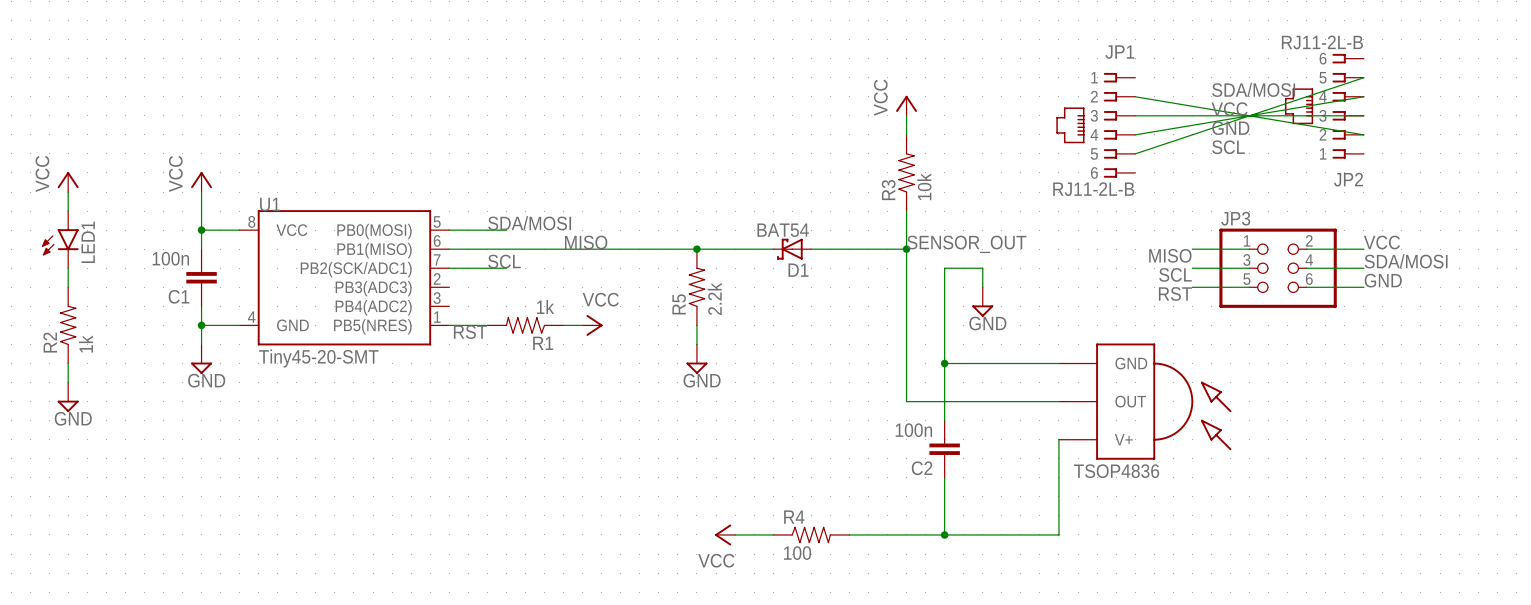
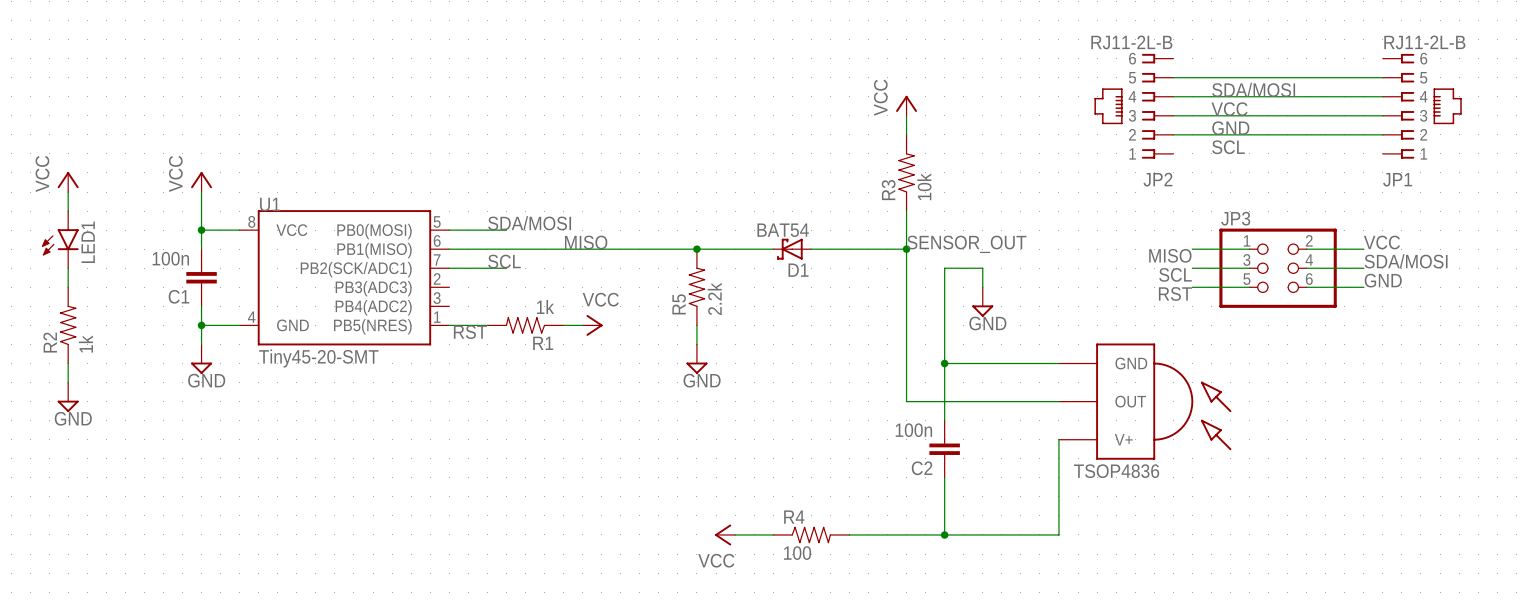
wire: none -> (1173, 77) (1382, 77)
wire: (1363, 77) (1135, 153) -> none
wire: (1135, 96) (1363, 134) -> none
wire: none -> (1173, 96) (1382, 96)
wire: (1363, 96) (1135, 134) -> none
JP2 position: (1324, 106) -> (1133, 106)
wire: none -> (1363, 115) (1382, 115)
JP1 rotation: 0° (1086, 125) -> 180° (1431, 106)
JP1 position: (1095, 125) -> (1422, 106)
wire: none -> (1173, 134) (1382, 134)

